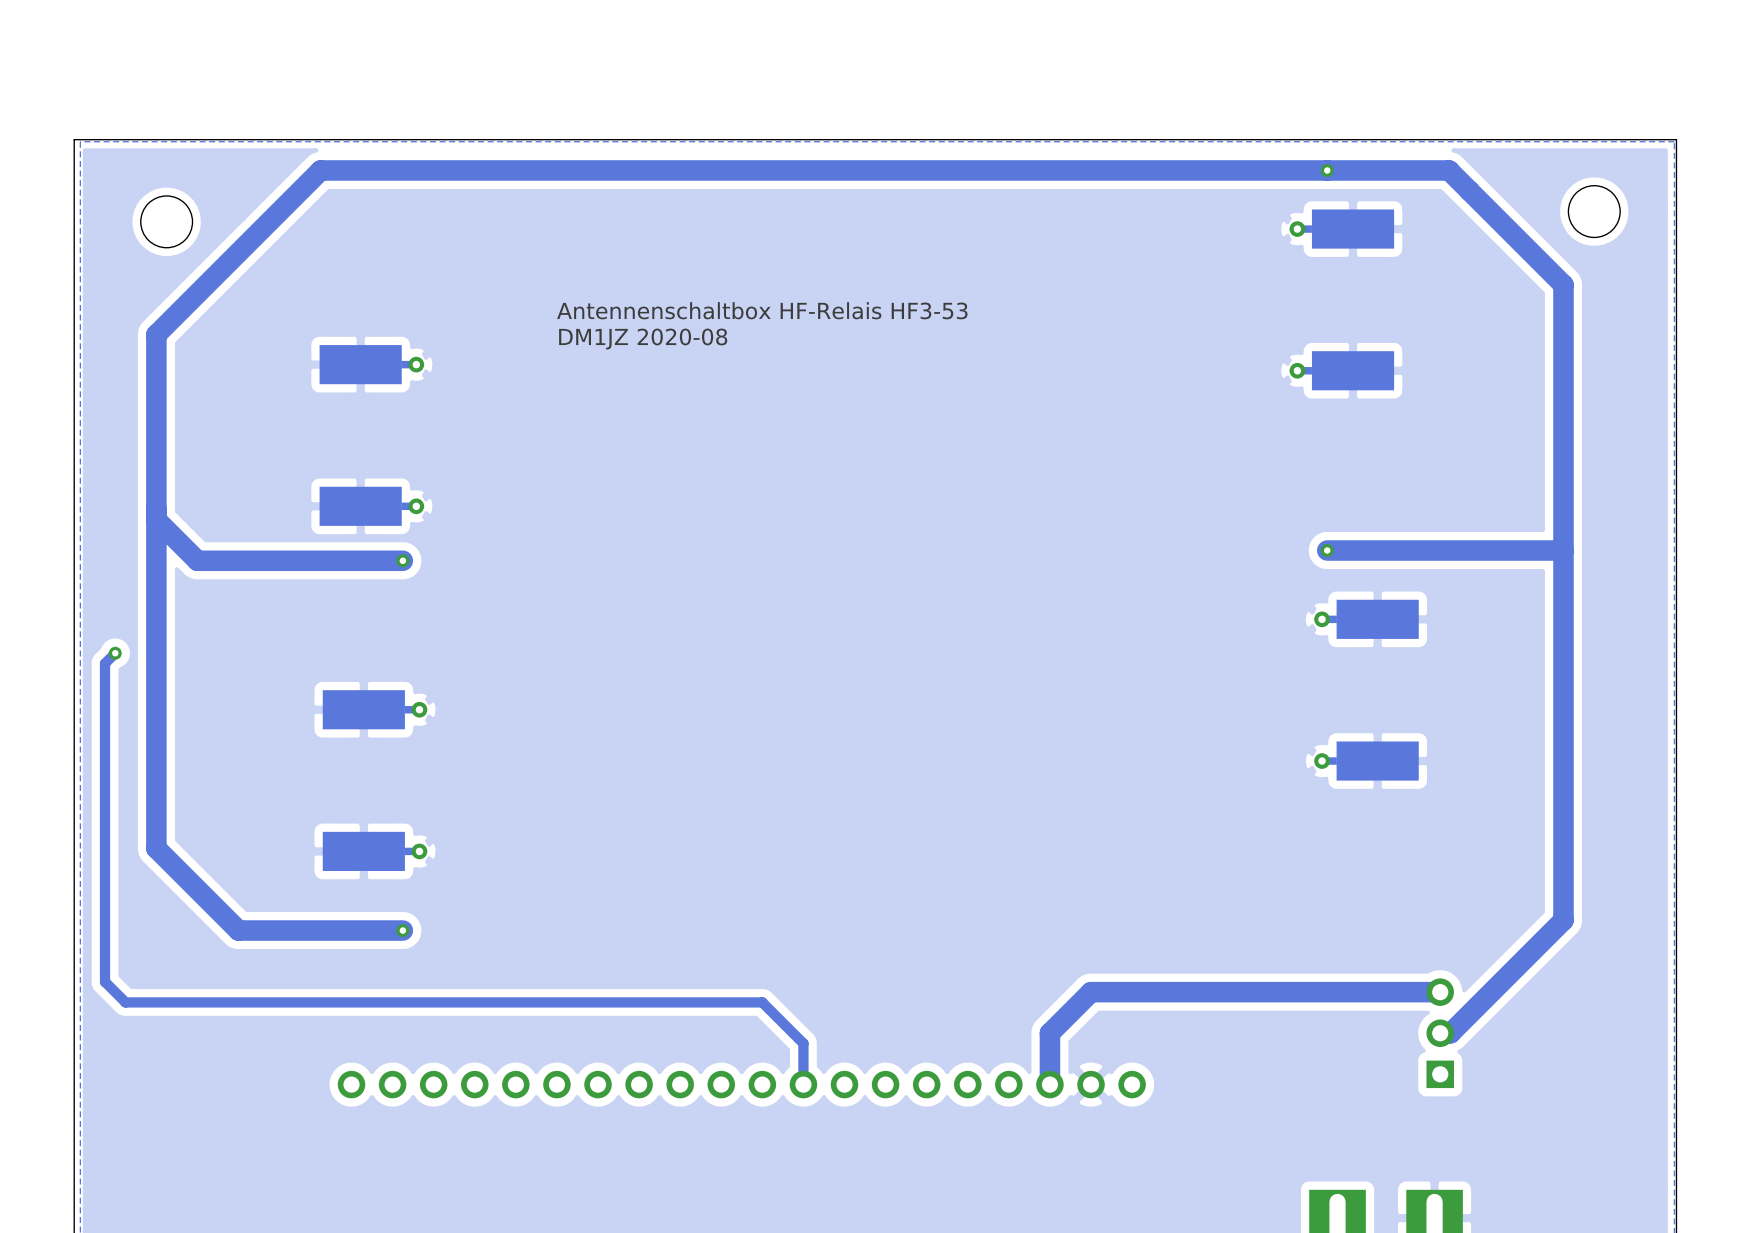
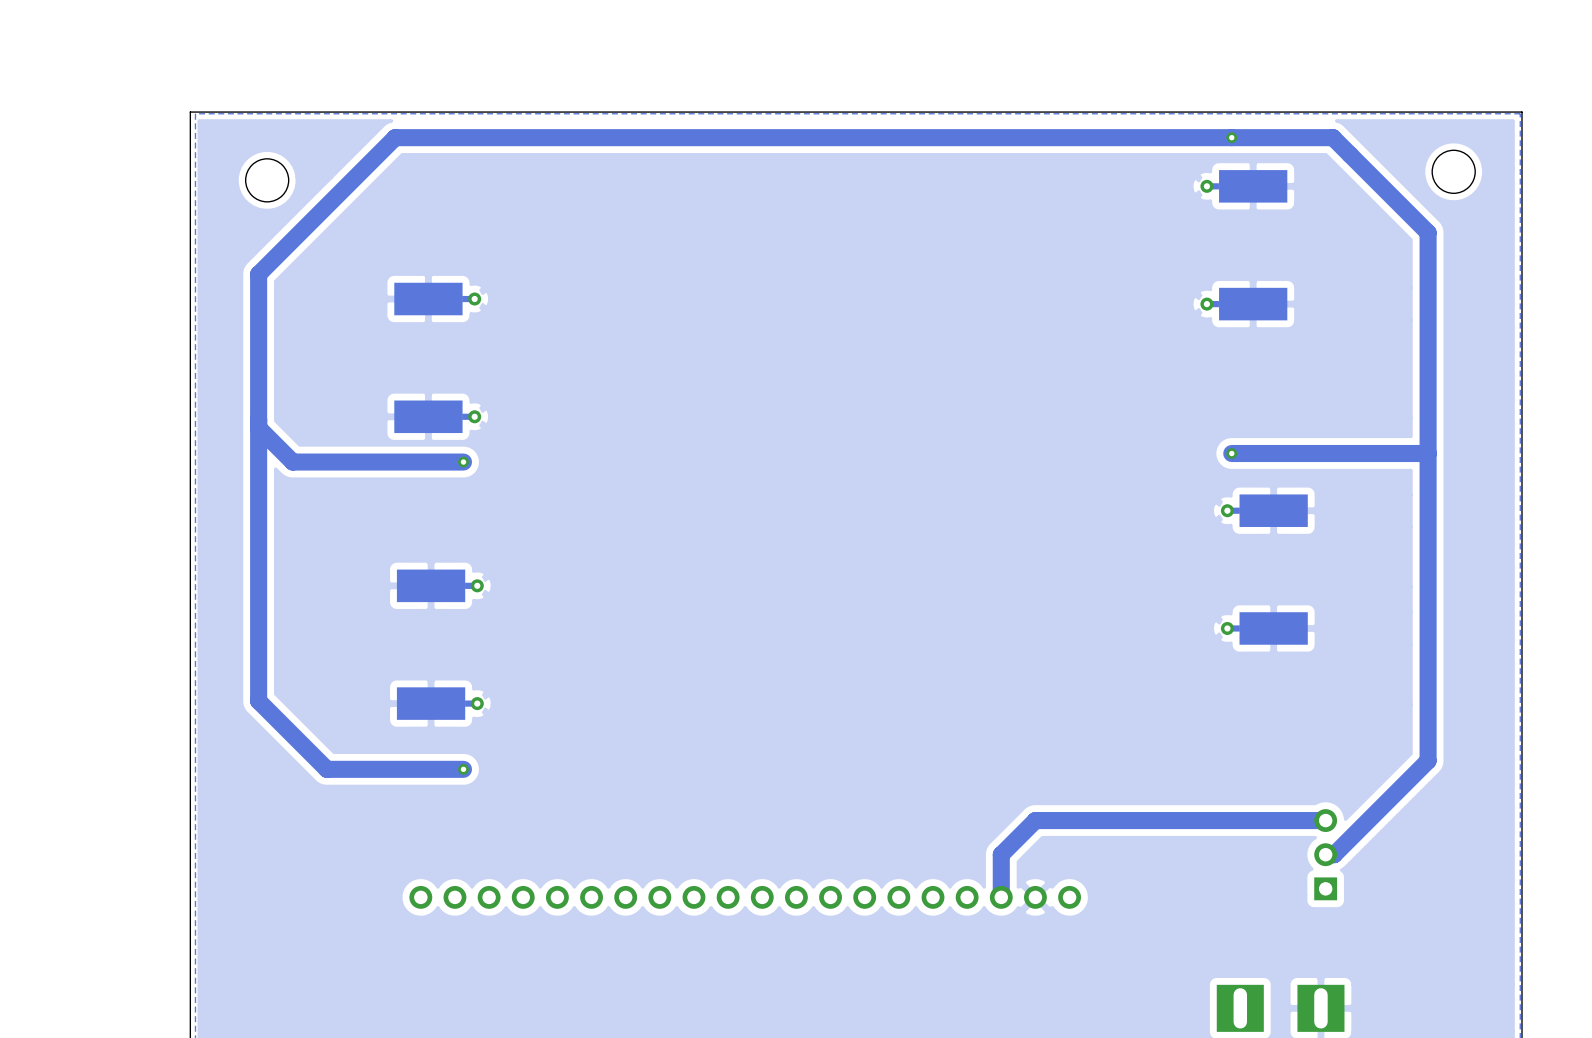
text: Antennenschaltbox HF-Relais HF3-53 (762, 310) -> none
text: DM1JZ 2020-08 (643, 339) -> none
track: (115, 653) (105, 663) (105, 981) (125, 1002) (762, 1002) (803, 1043) (803, 1084) -> none
via: (115, 653) -> none

